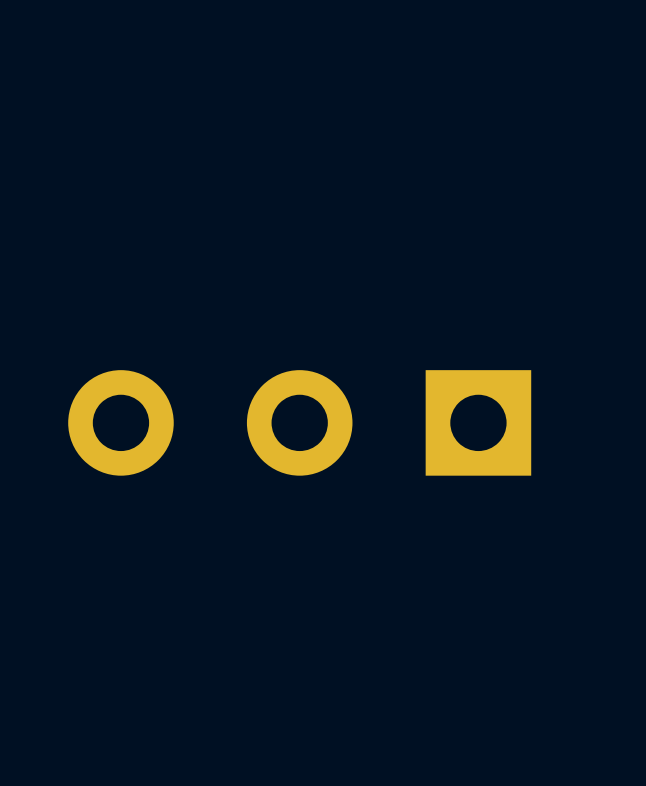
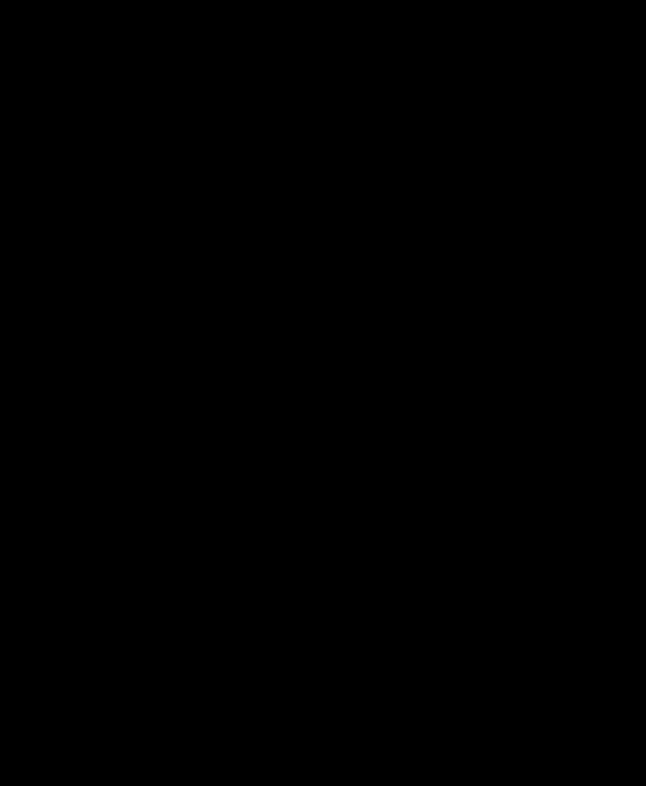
part: (299, 422) -> none

